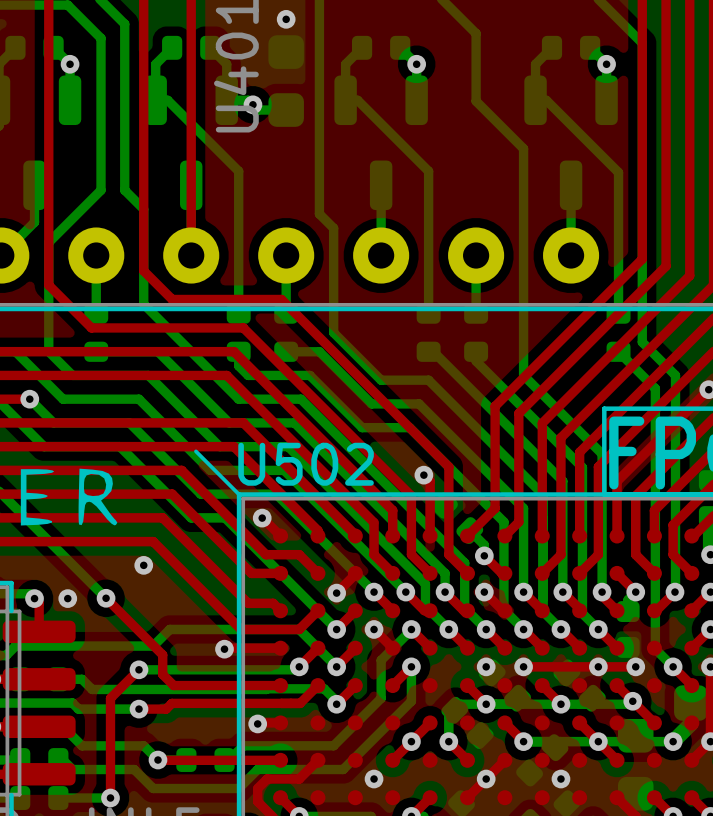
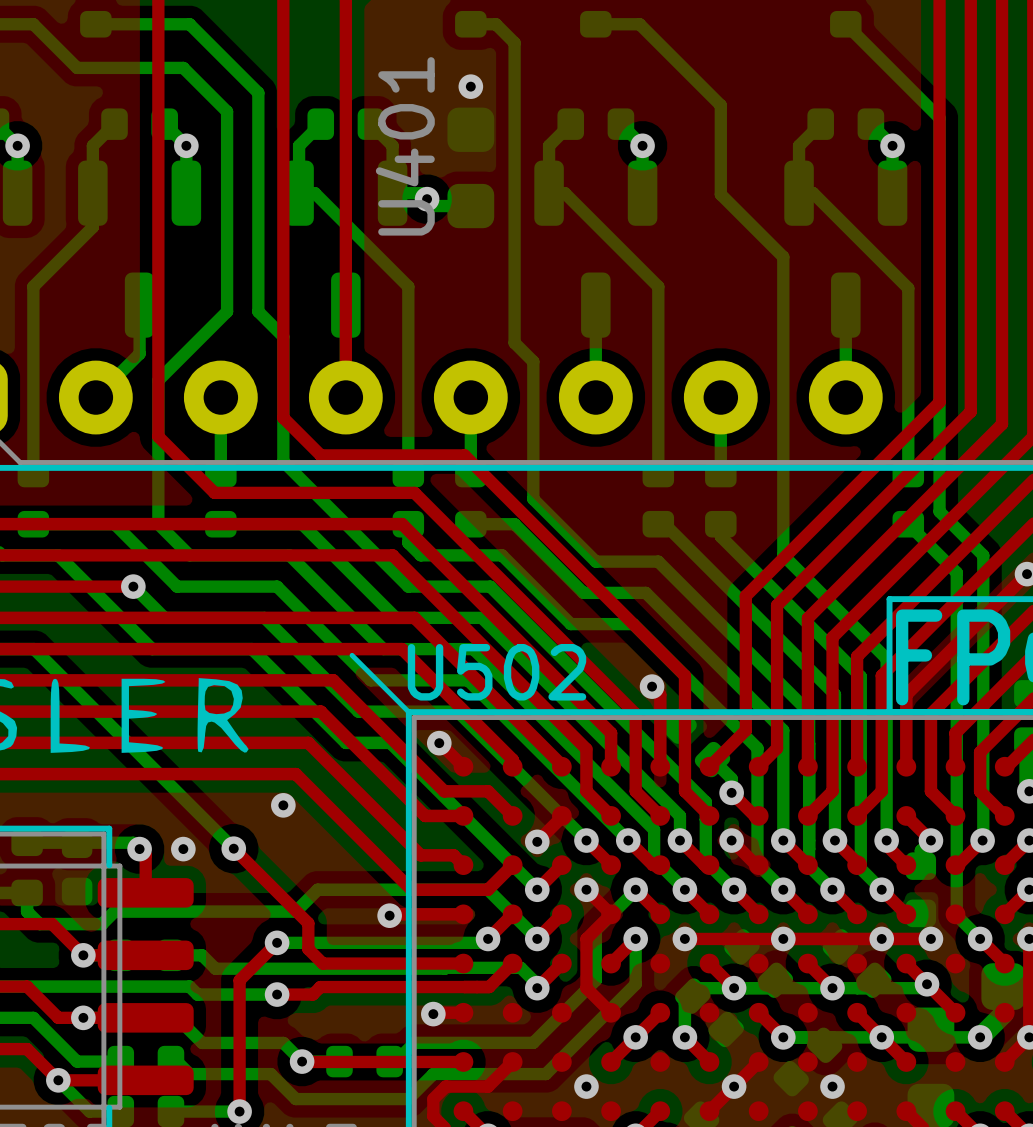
top track: none -> (611, 914) (586, 938) (586, 988) (611, 1012)
top track: none -> (684, 938) (783, 938)
via position: (486, 666) -> (684, 938)

